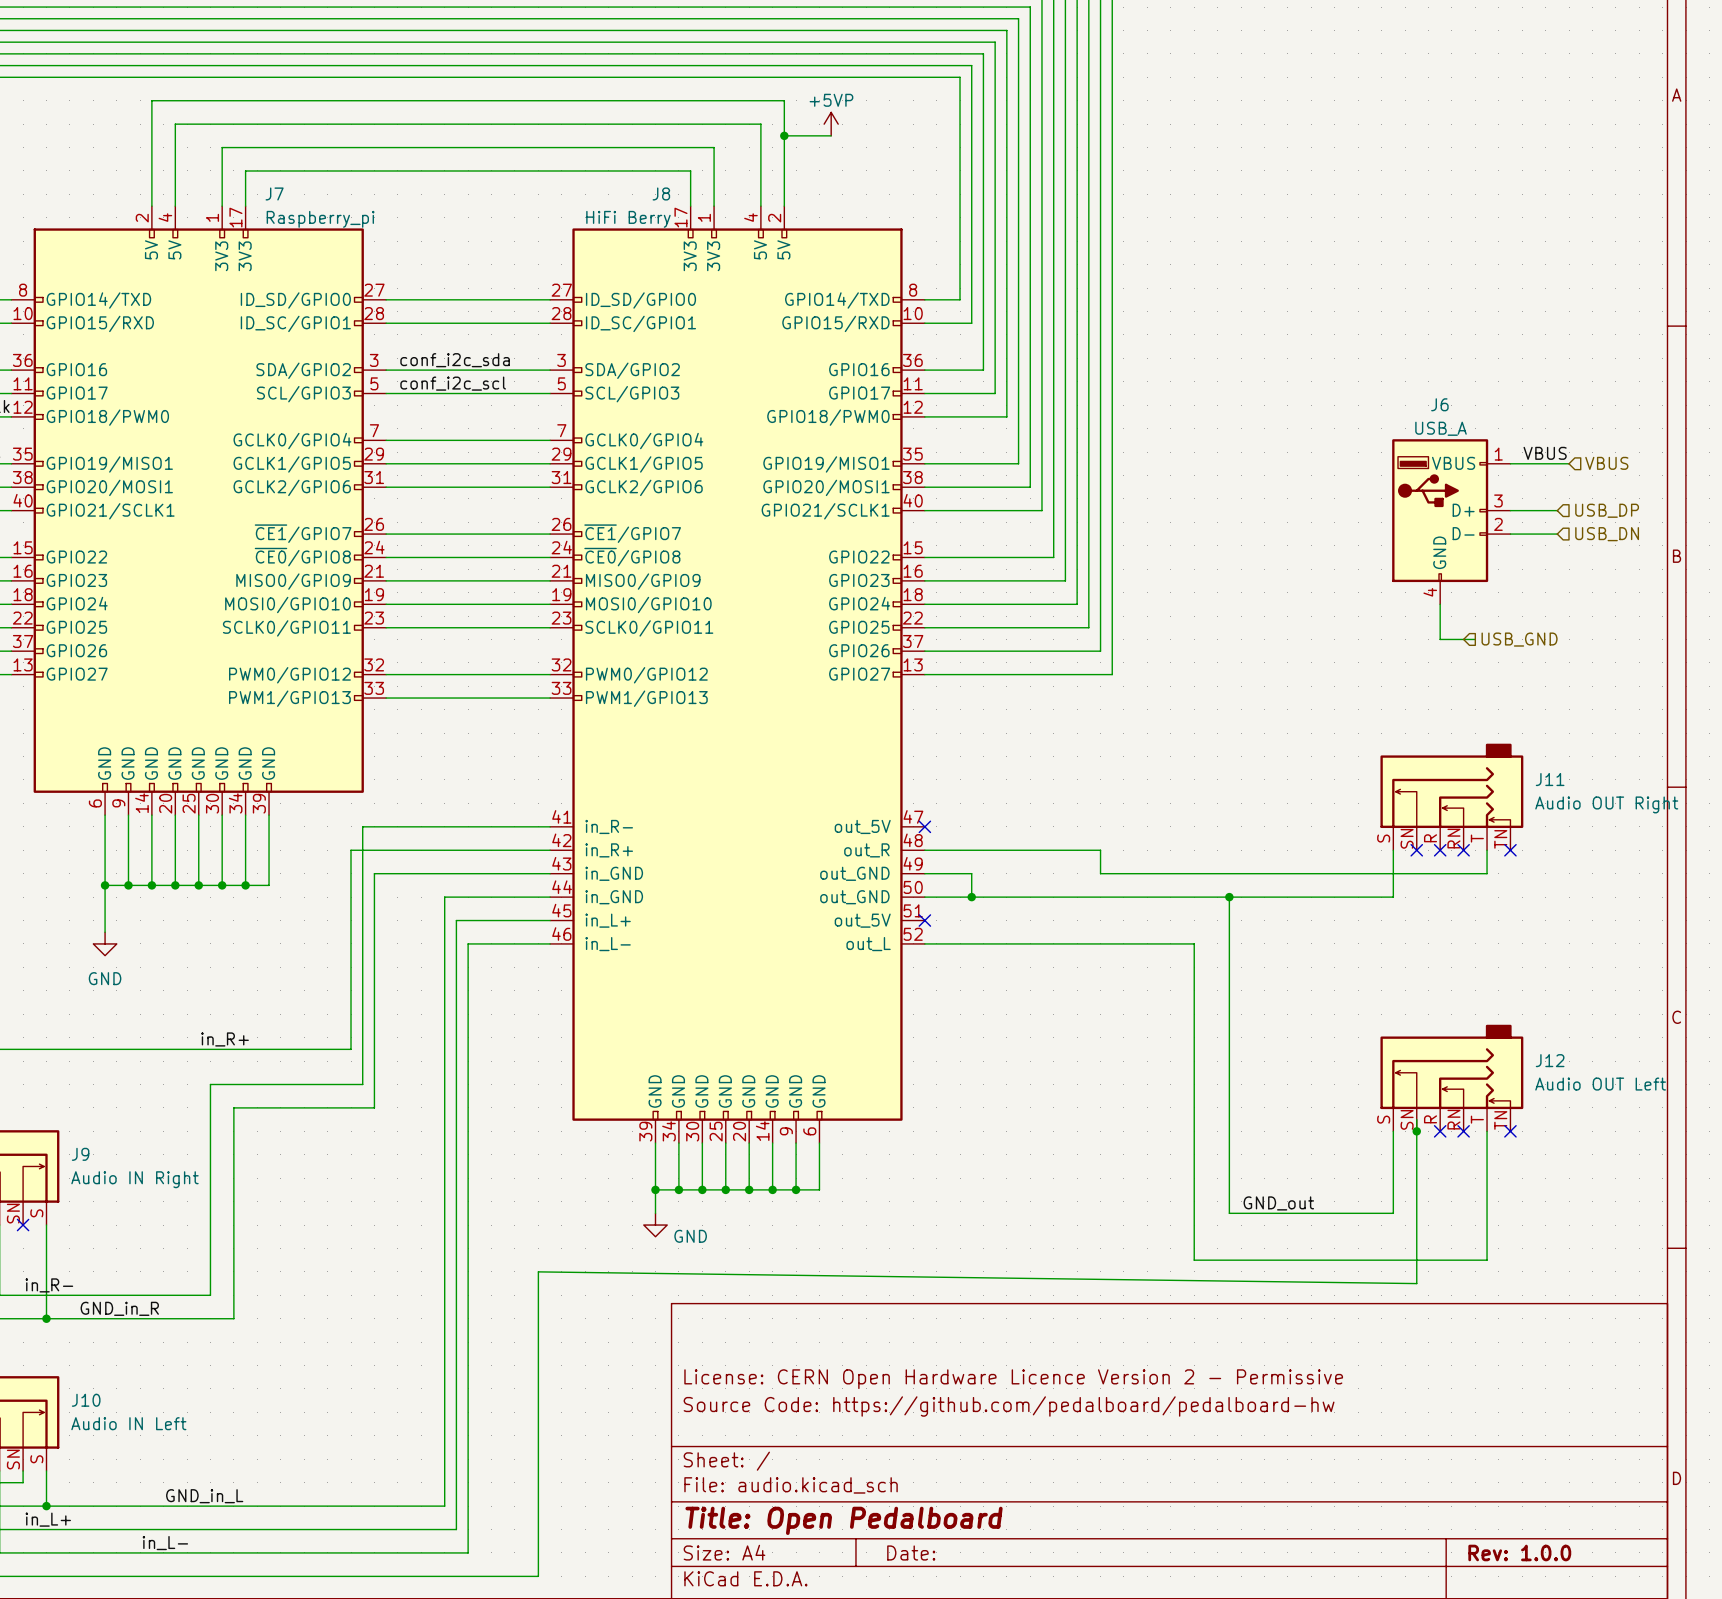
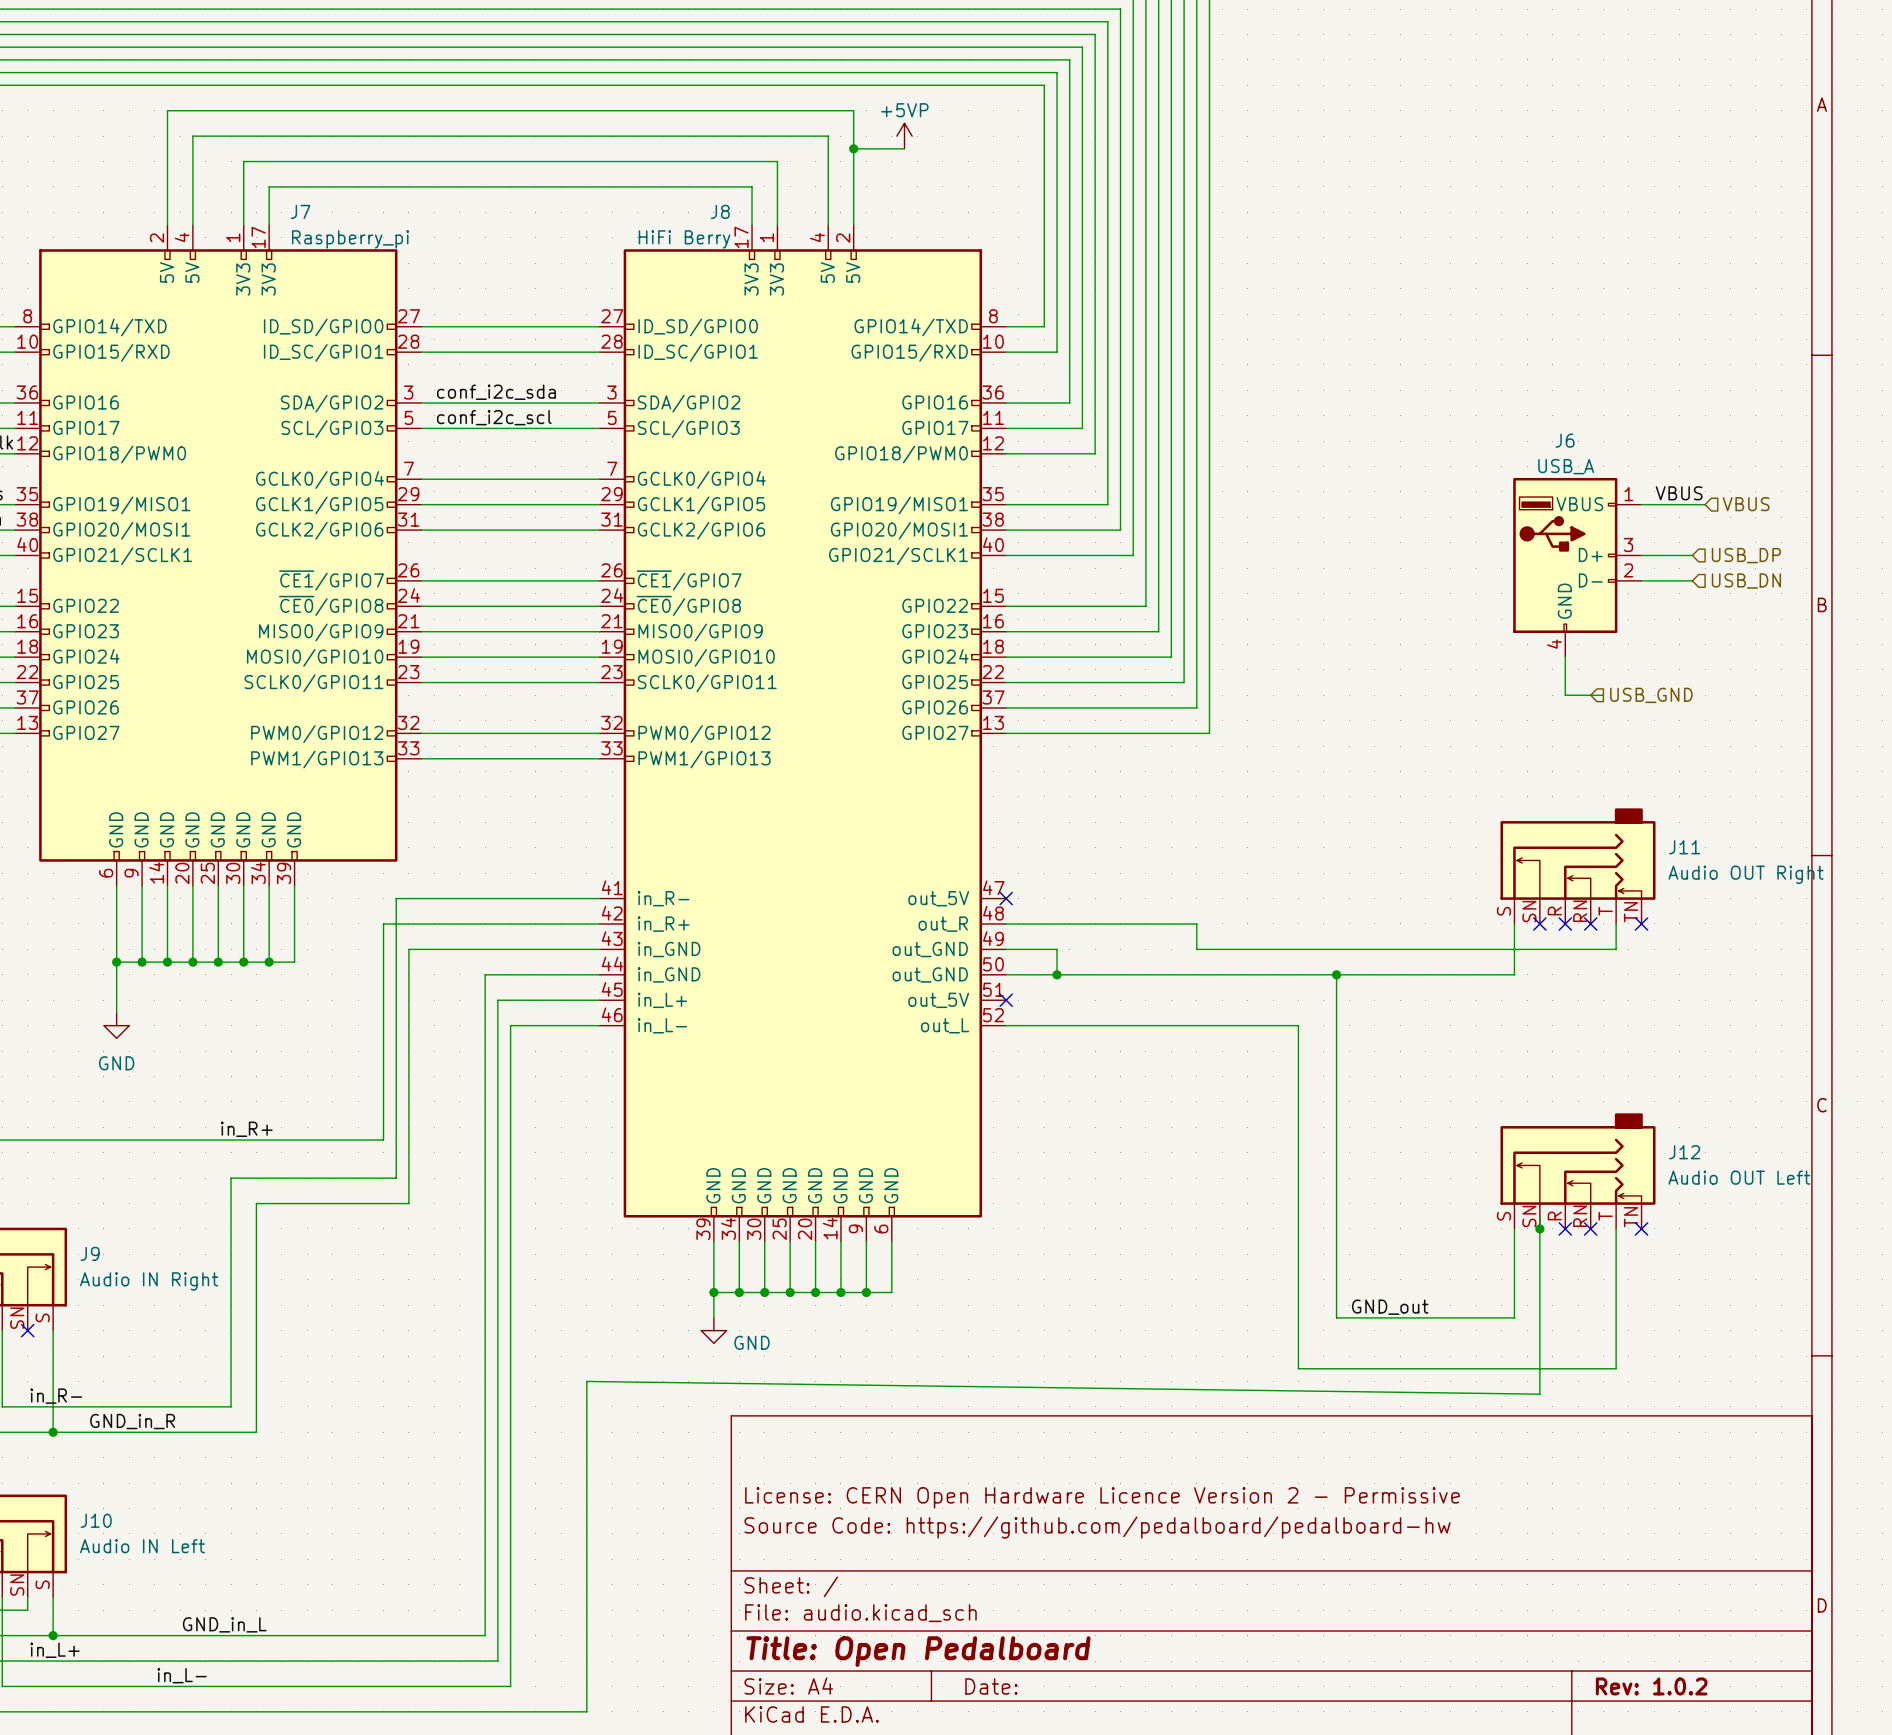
title block: Rev: 1.0.0 (1519, 1552) -> Rev: 1.0.2 (1651, 1686)

